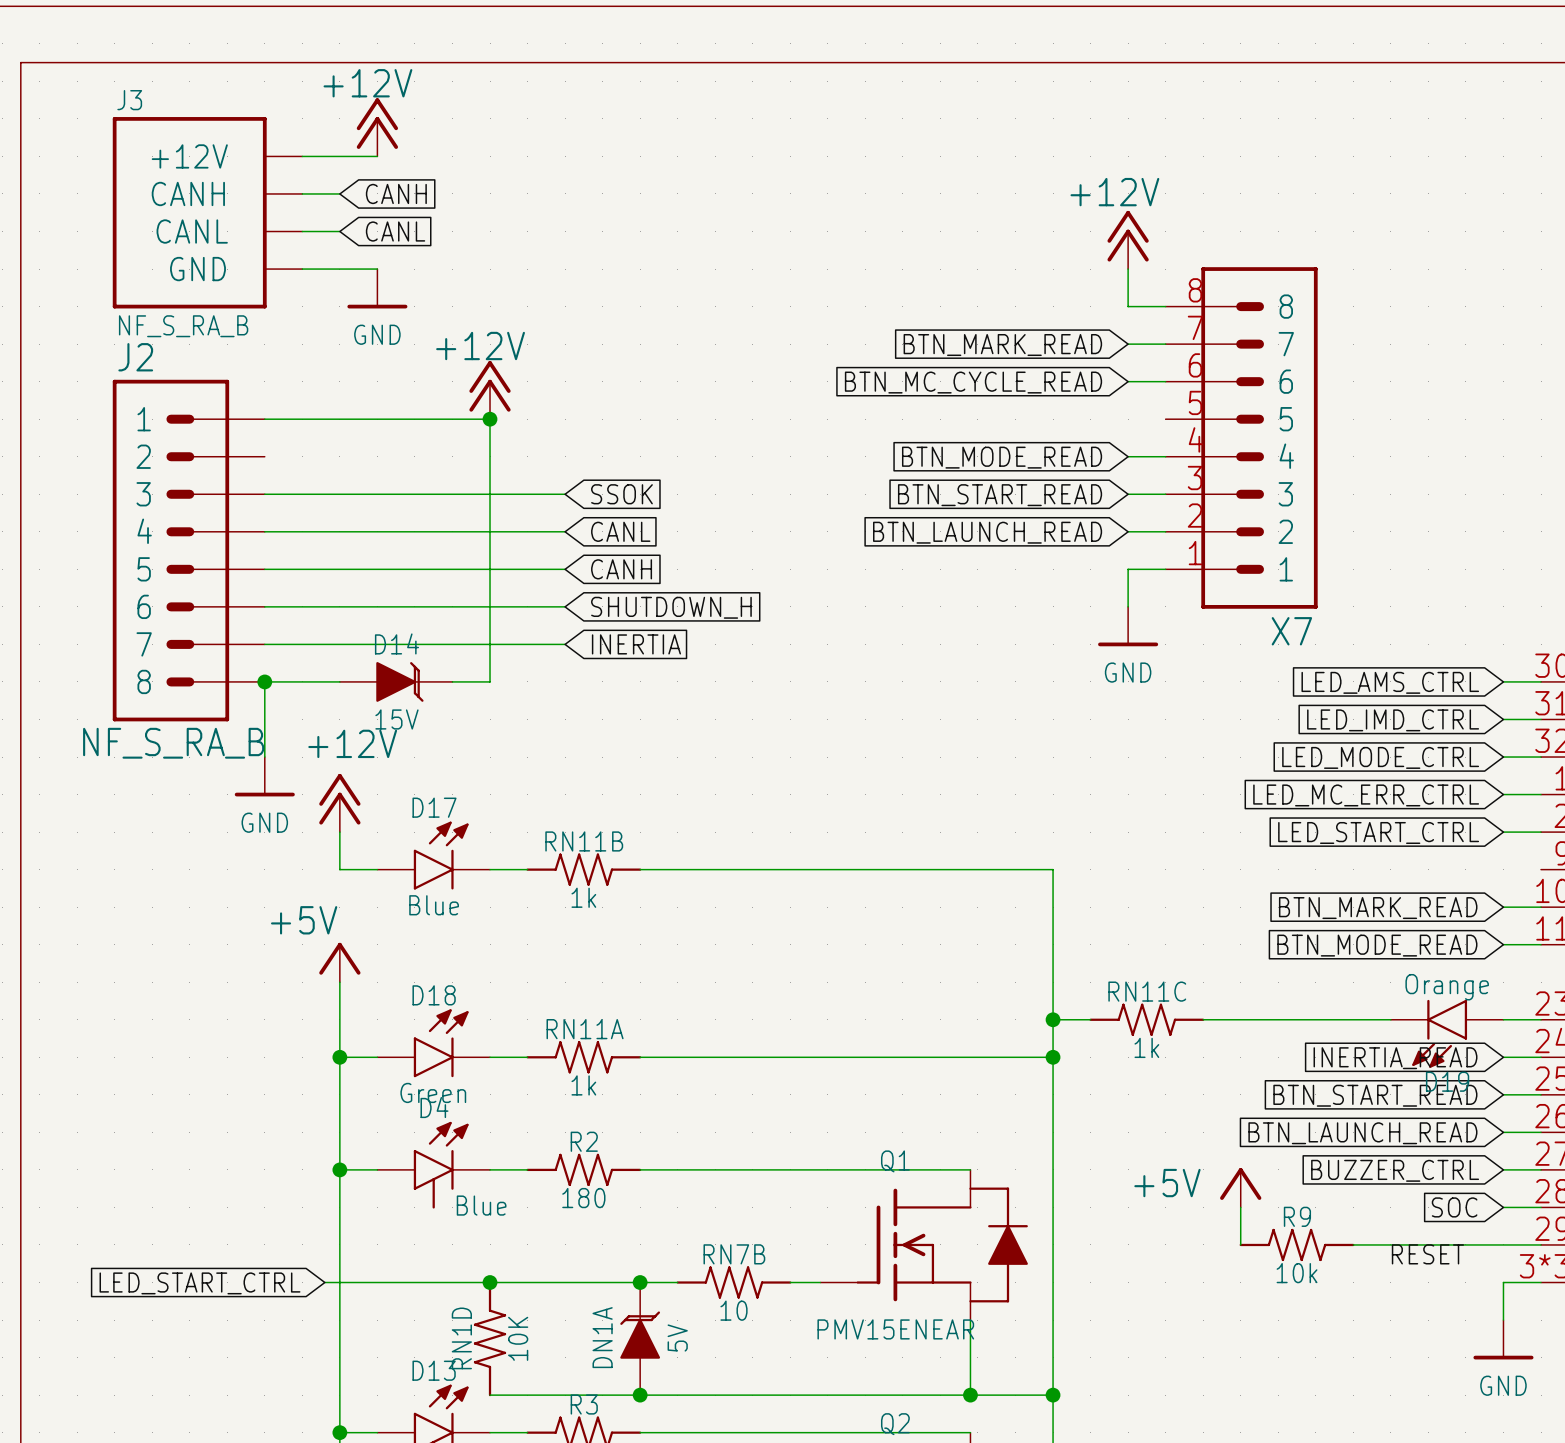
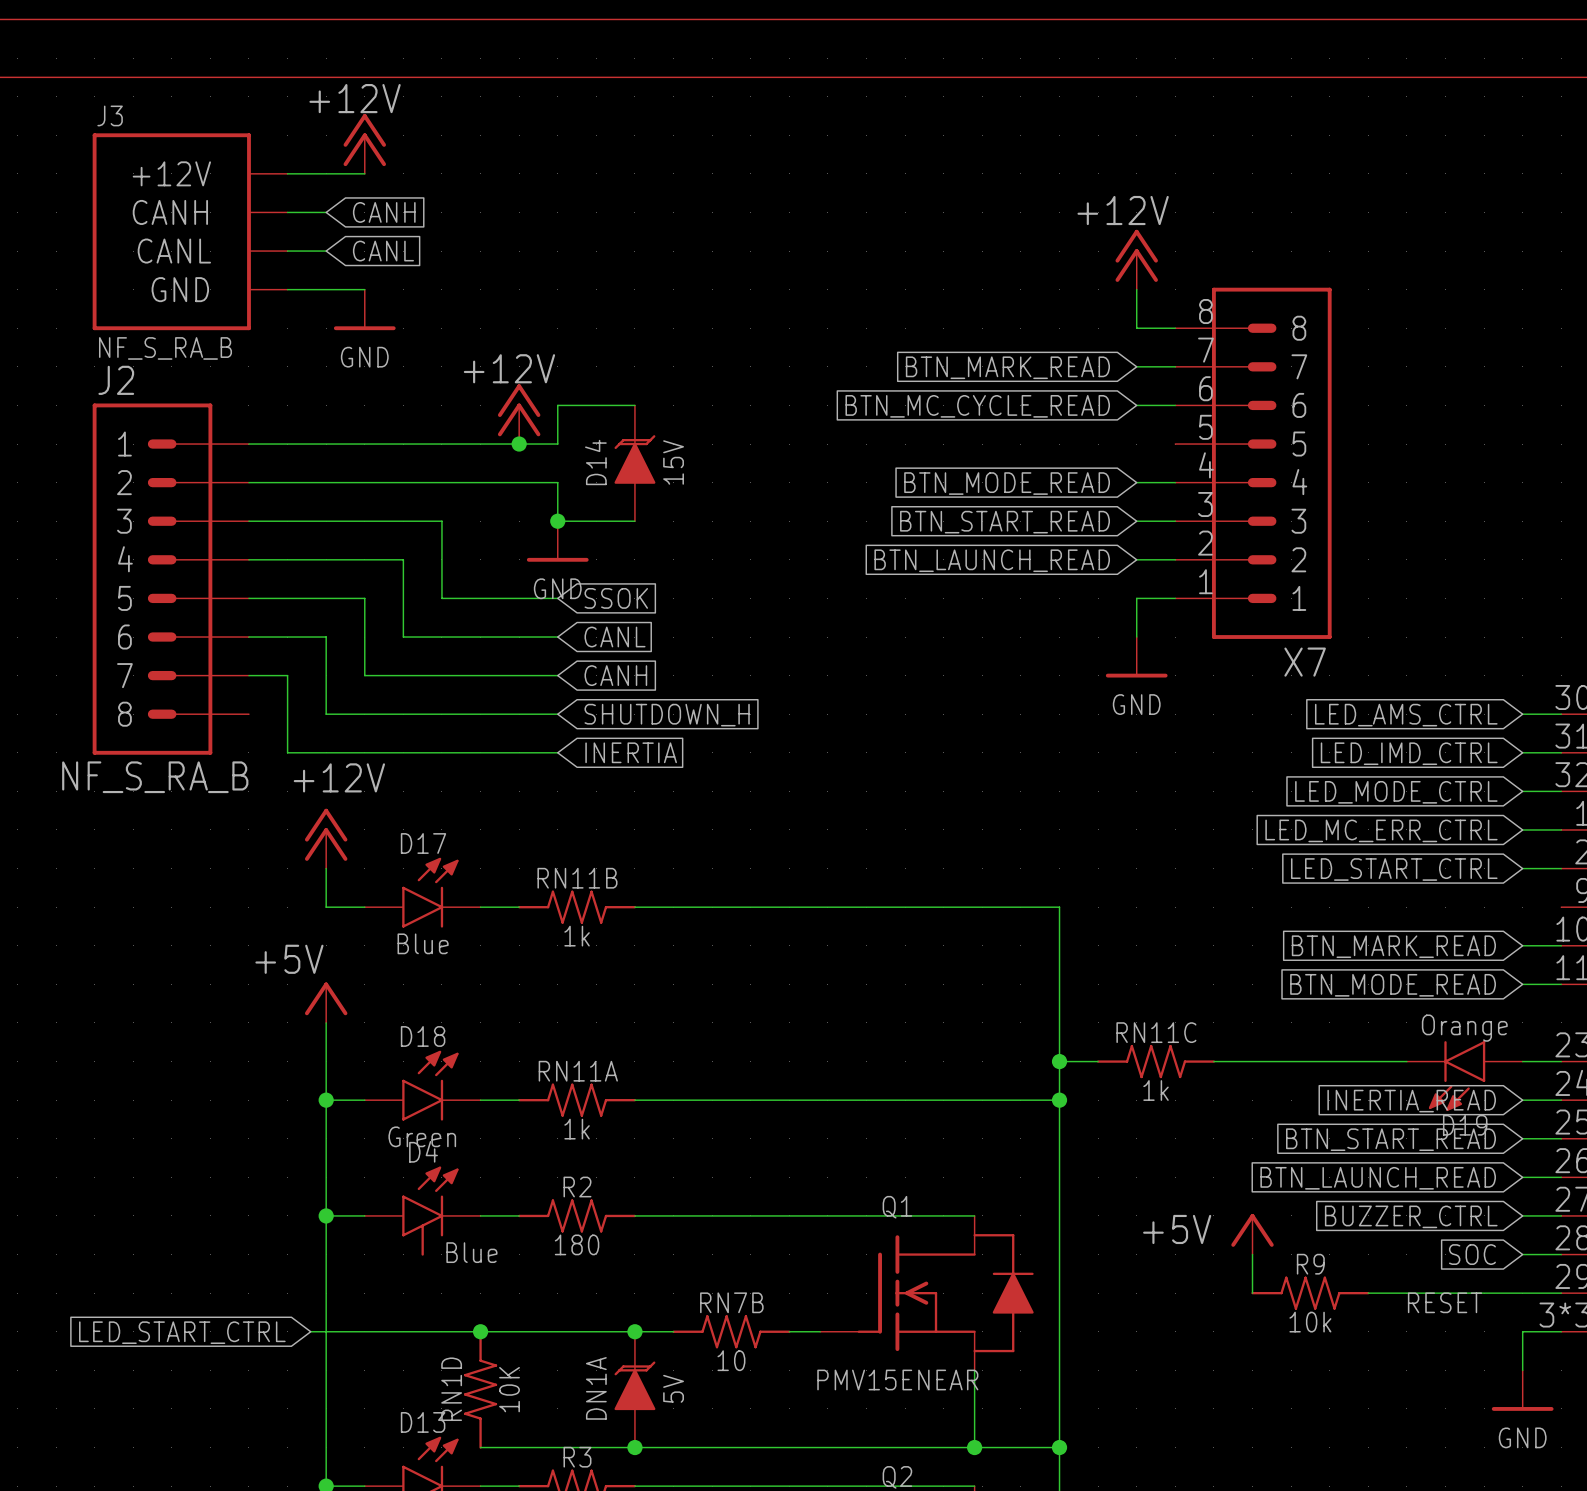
wire: none -> (634, 405) (557, 405) (557, 444) (480, 444)
power symbol position: +12V (490, 390) -> +12V (519, 414)
wire: (490, 419) (490, 681) -> (557, 714) (480, 714)
junction position: (490, 419) -> (519, 444)
wire: none -> (248, 482) (557, 482) (557, 521) (634, 521)
wire: (452, 494) (565, 494) -> none
junction: none -> (557, 521)
global label: SSOK (621, 494) -> none
power symbol: none -> GND (557, 541)
wire: (414, 531) (565, 531) -> (403, 559) (403, 637)
global label: CANL (620, 531) -> none
wire: (377, 569) (452, 569) -> (441, 521) (441, 598)
global label: CANH (621, 569) -> SSOK (616, 598)
wire: (339, 606) (414, 606) -> (326, 637) (326, 714) (441, 714)
global label: SHUTDOWN_H (671, 607) -> CANL (615, 637)
wire: (302, 644) (377, 644) -> (364, 598) (364, 675)
wire: none -> (287, 675) (287, 752) (557, 752)
global label: INERTIA (636, 644) -> CANH (615, 675)
junction: (264, 681) -> none
wire: (339, 681) (264, 681) (264, 757) -> none
D14 position: (396, 681) -> (634, 463)
D14 rotation: 0° (399, 681) -> 90° counterclockwise (634, 459)
global label: none -> SHUTDOWN_H (667, 715)
global label: none -> INERTIA (631, 752)
power symbol: GND (264, 776) -> none

